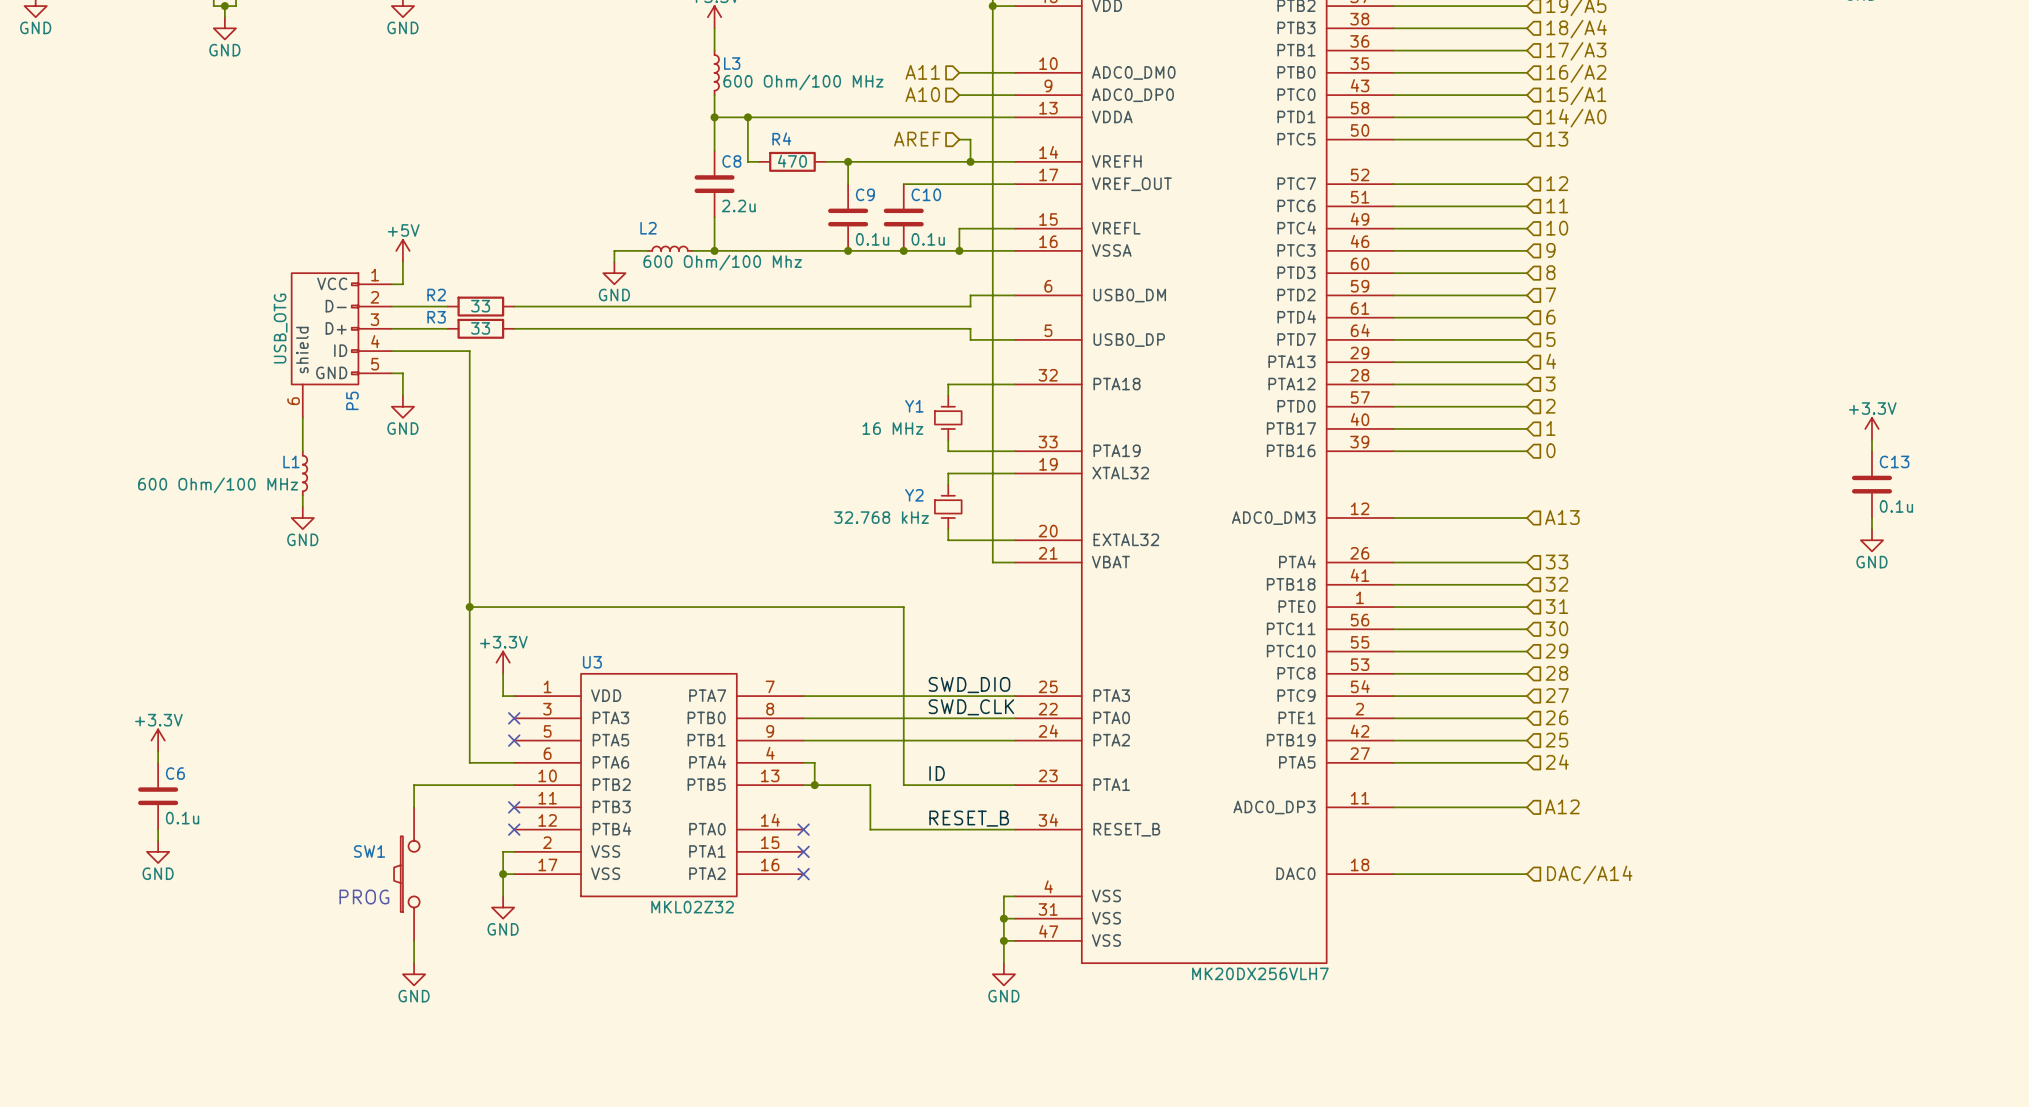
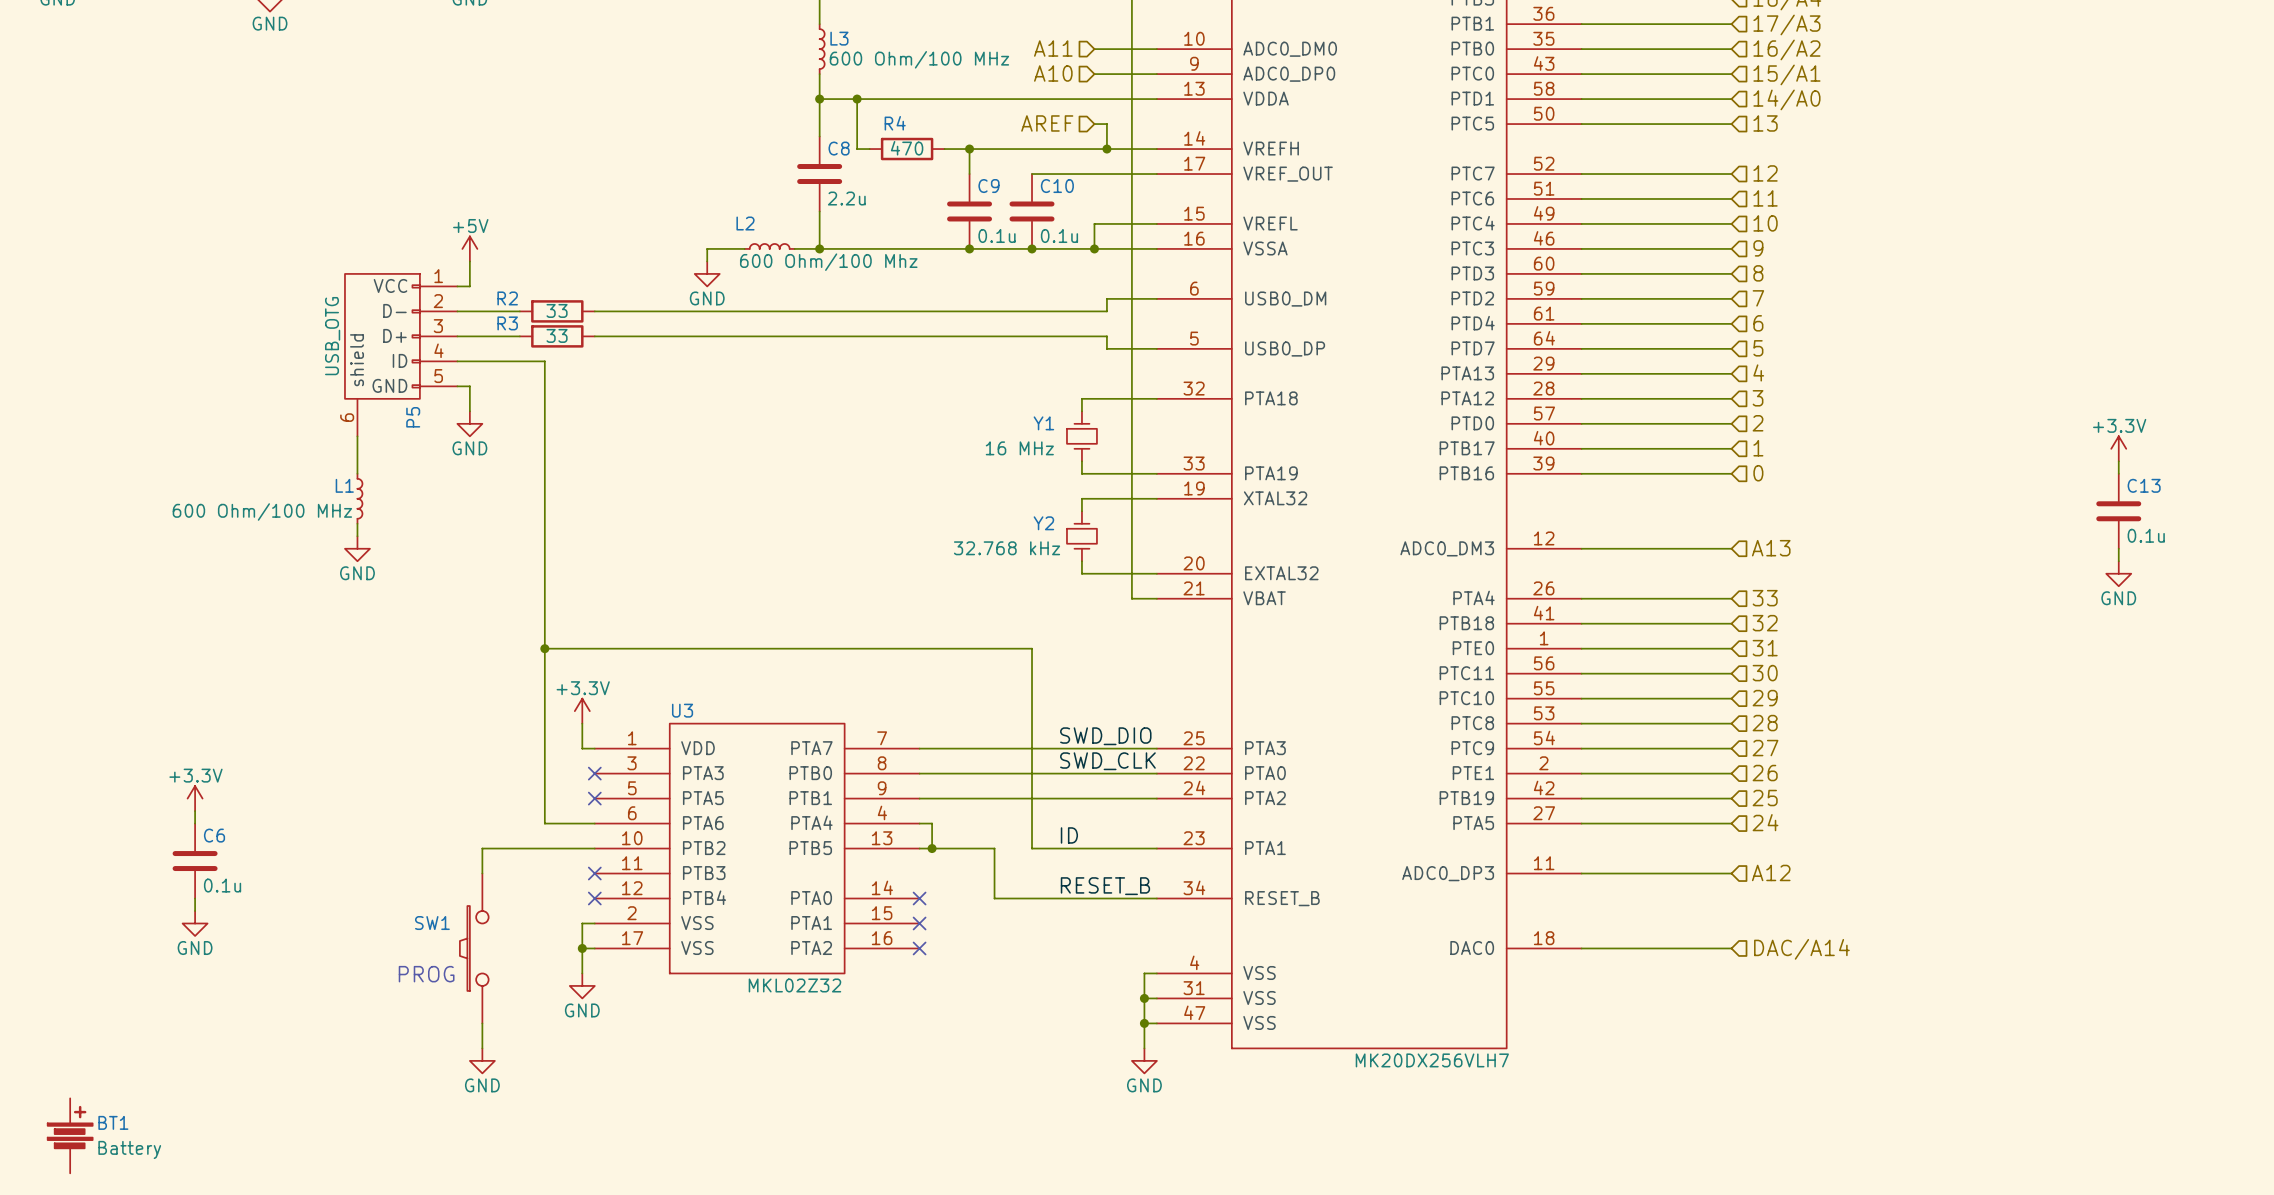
BT1: none -> Battery (70, 1135)

